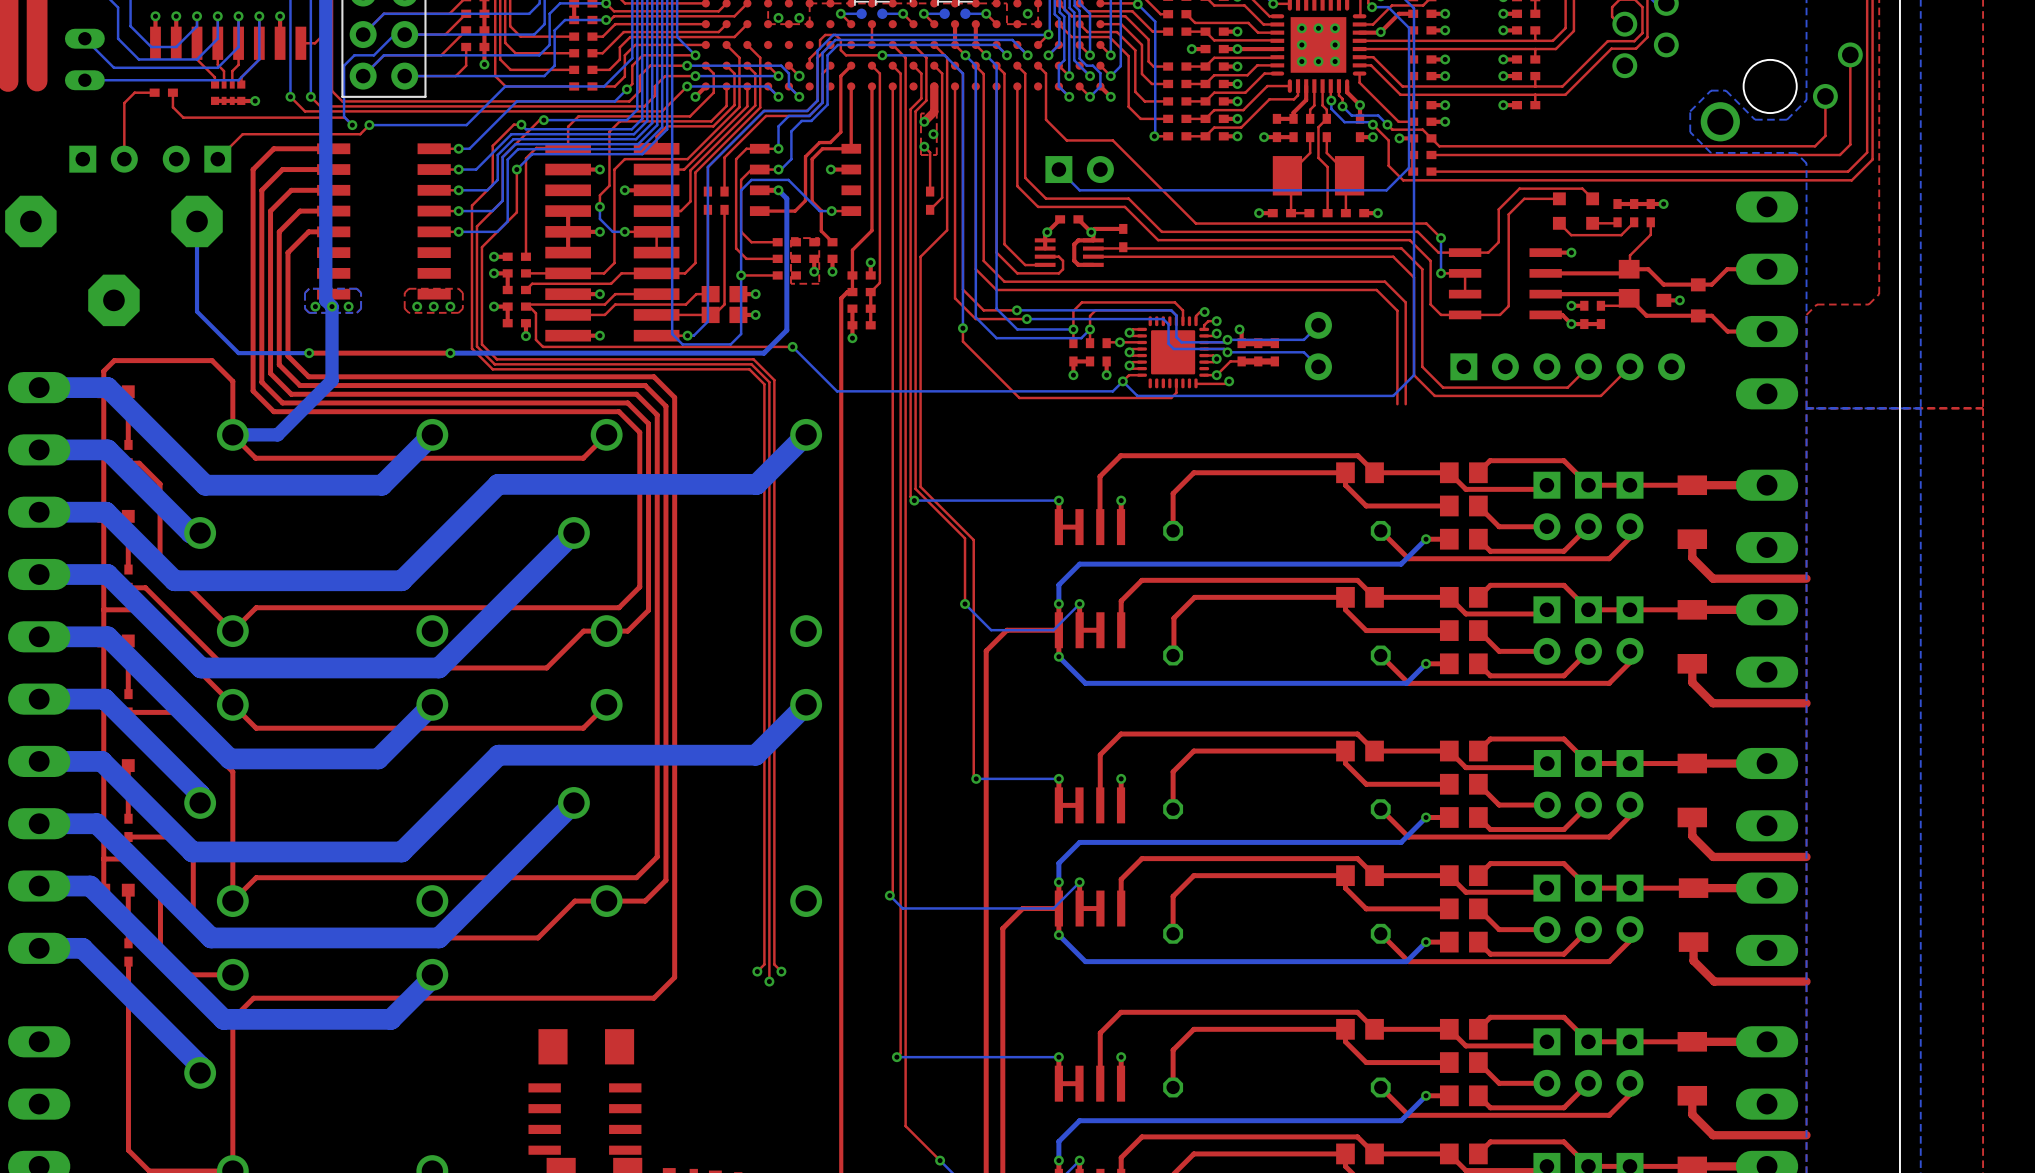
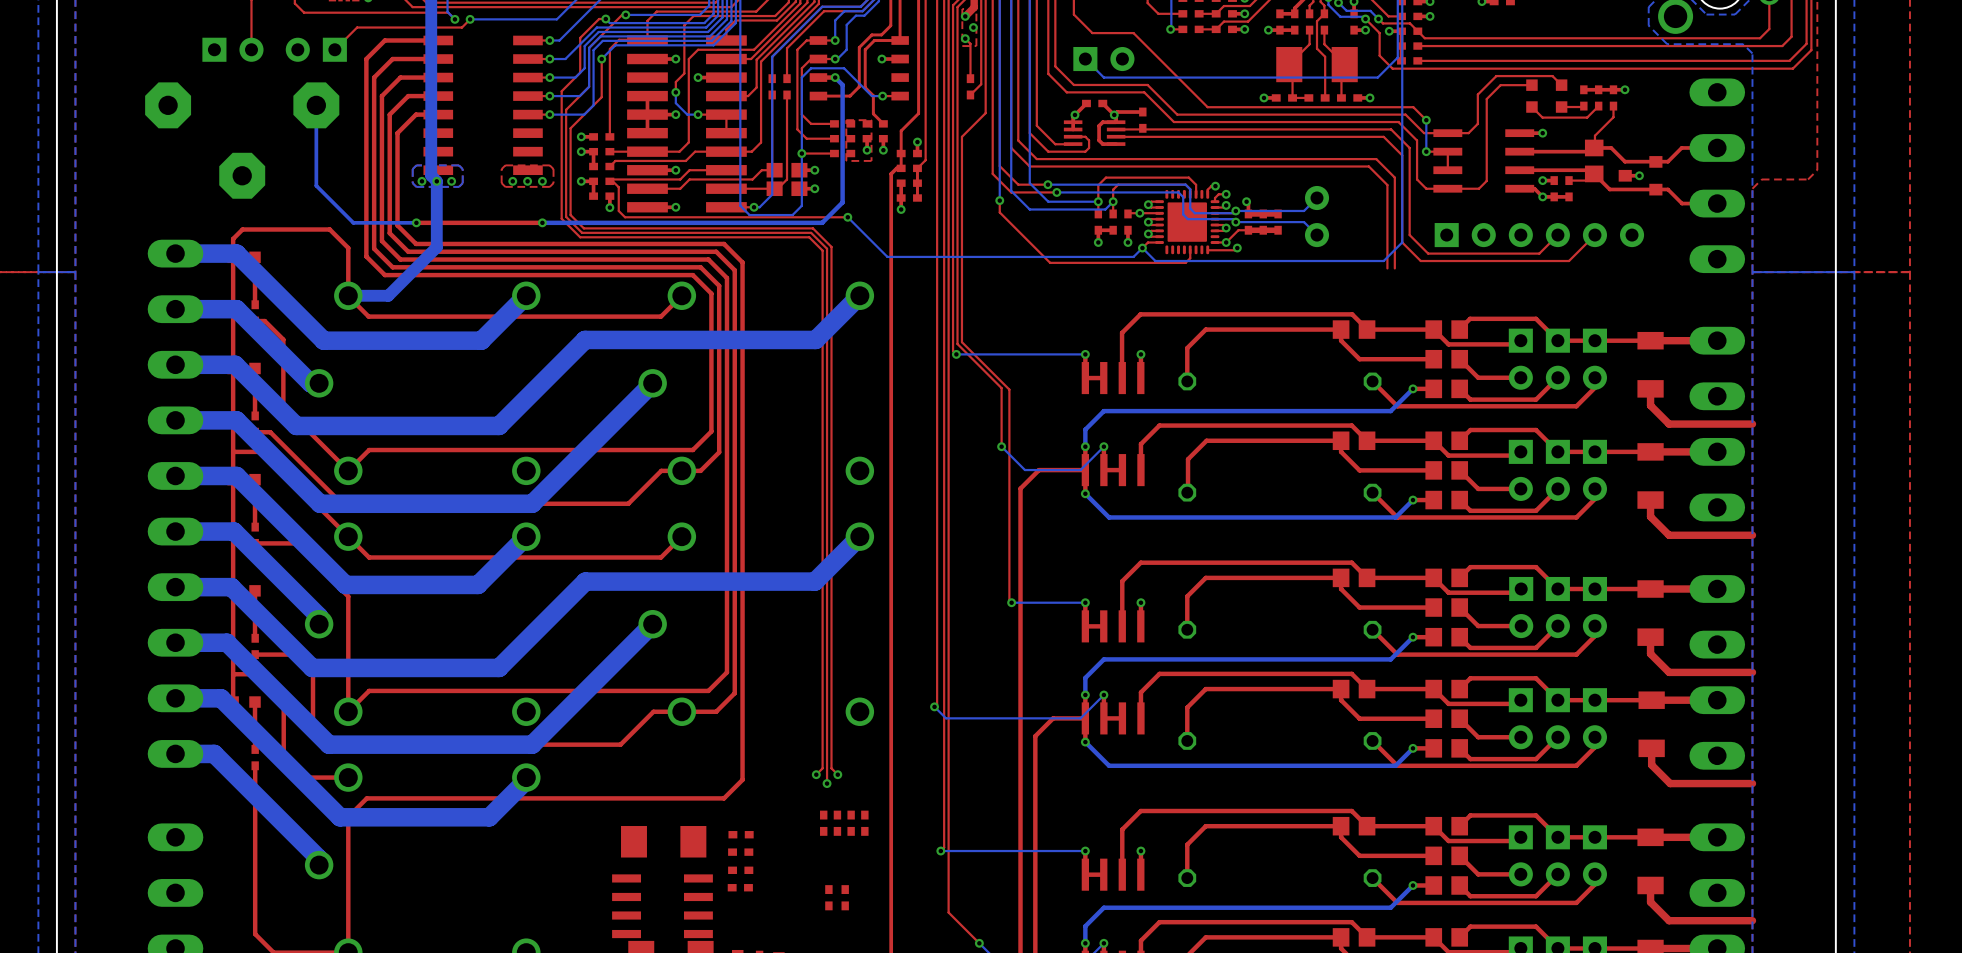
part: none -> (823, 823)
part: none -> (837, 823)
part: none -> (851, 823)
part: none -> (864, 823)
part: none -> (741, 834)
part: none -> (740, 852)
part: none -> (740, 870)
part: none -> (740, 887)
part: none -> (828, 897)
part: none -> (845, 897)

